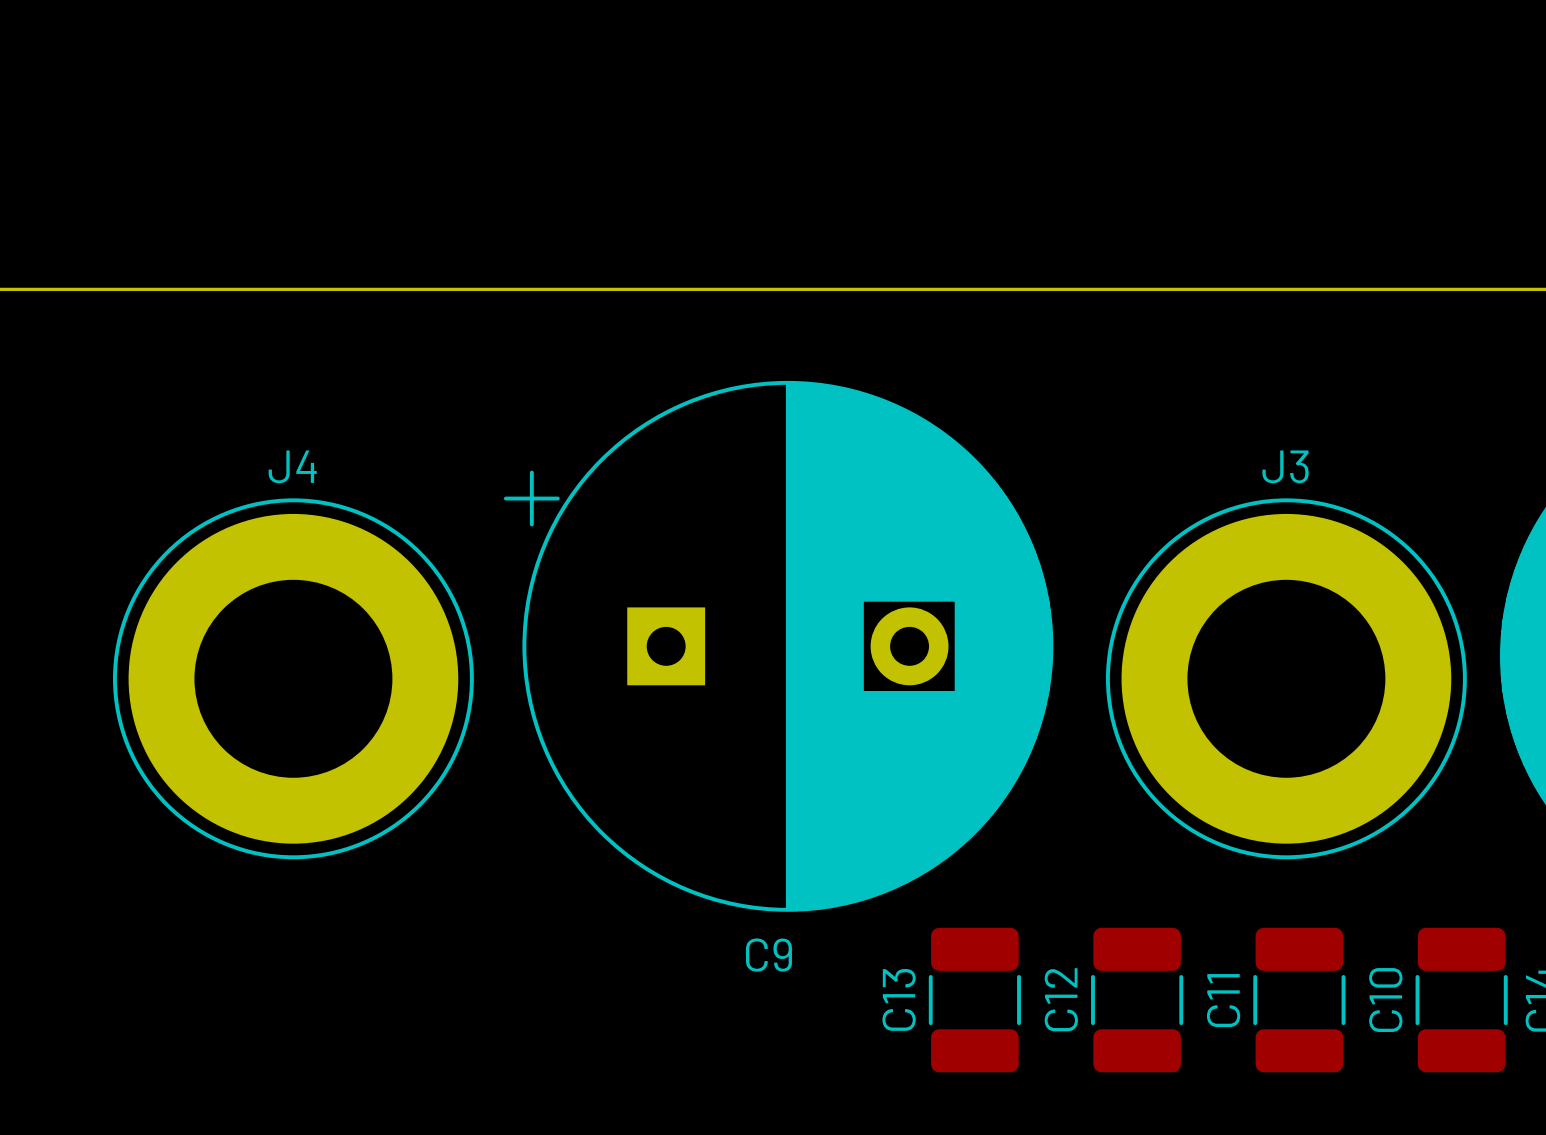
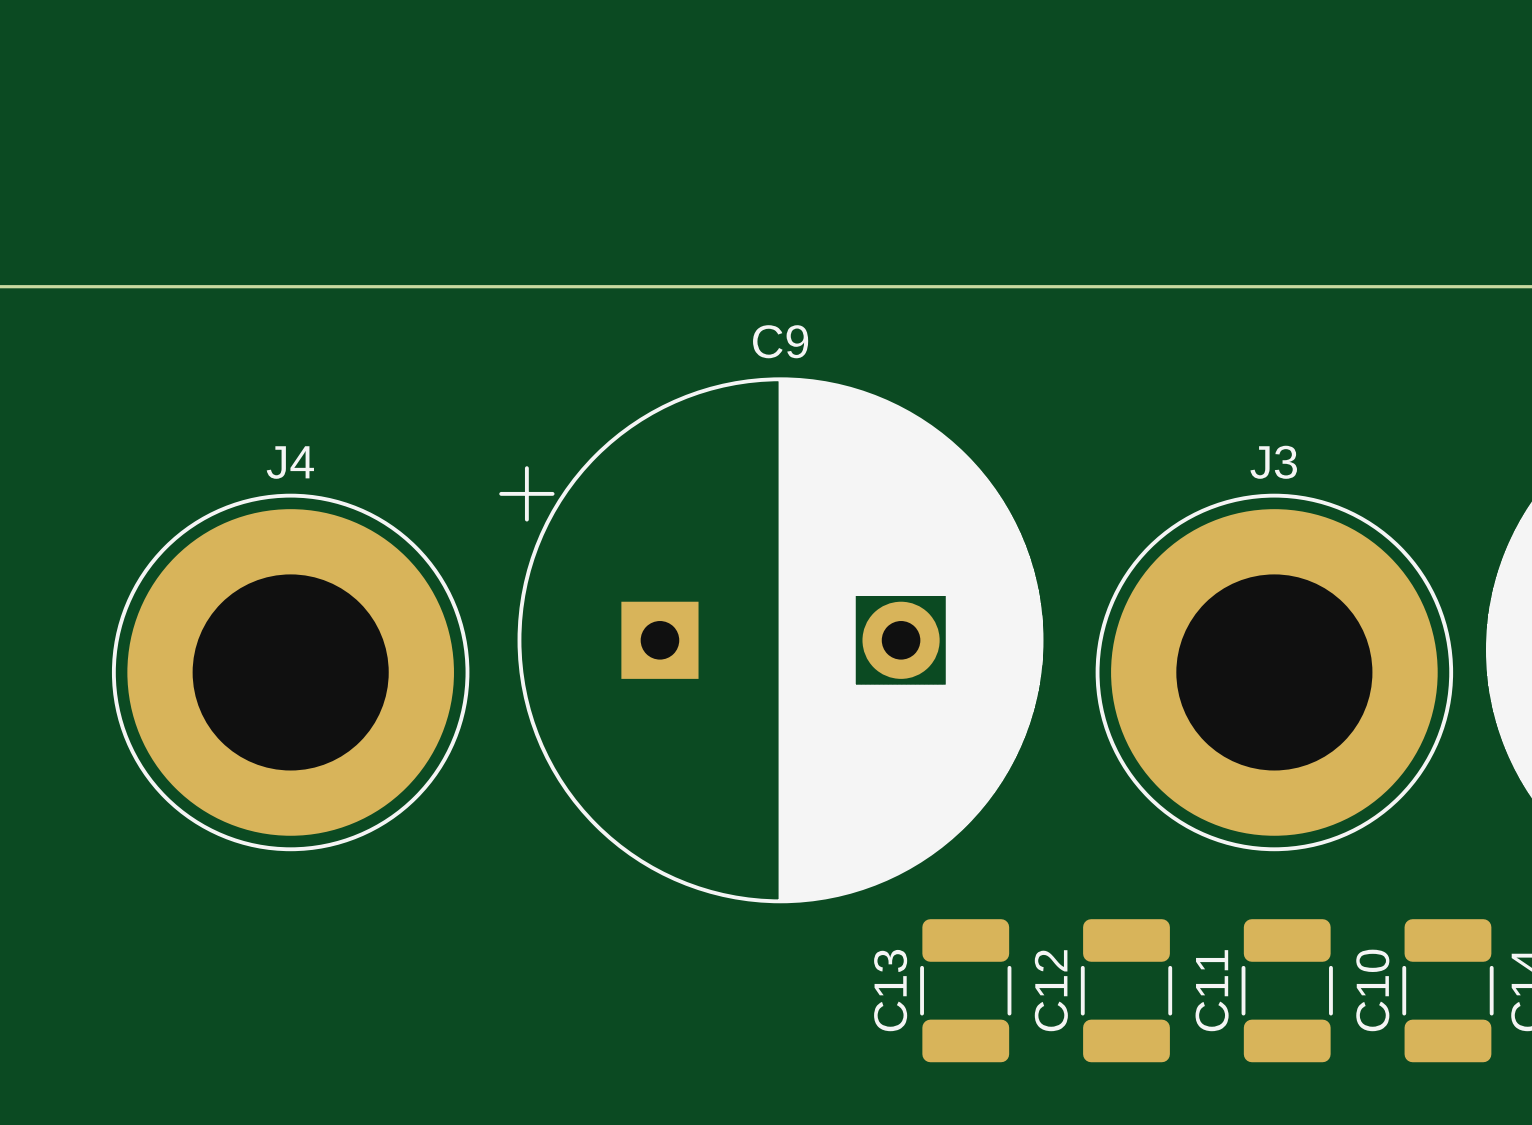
C9 name position: C9 (768, 955) -> C9 (780, 341)

